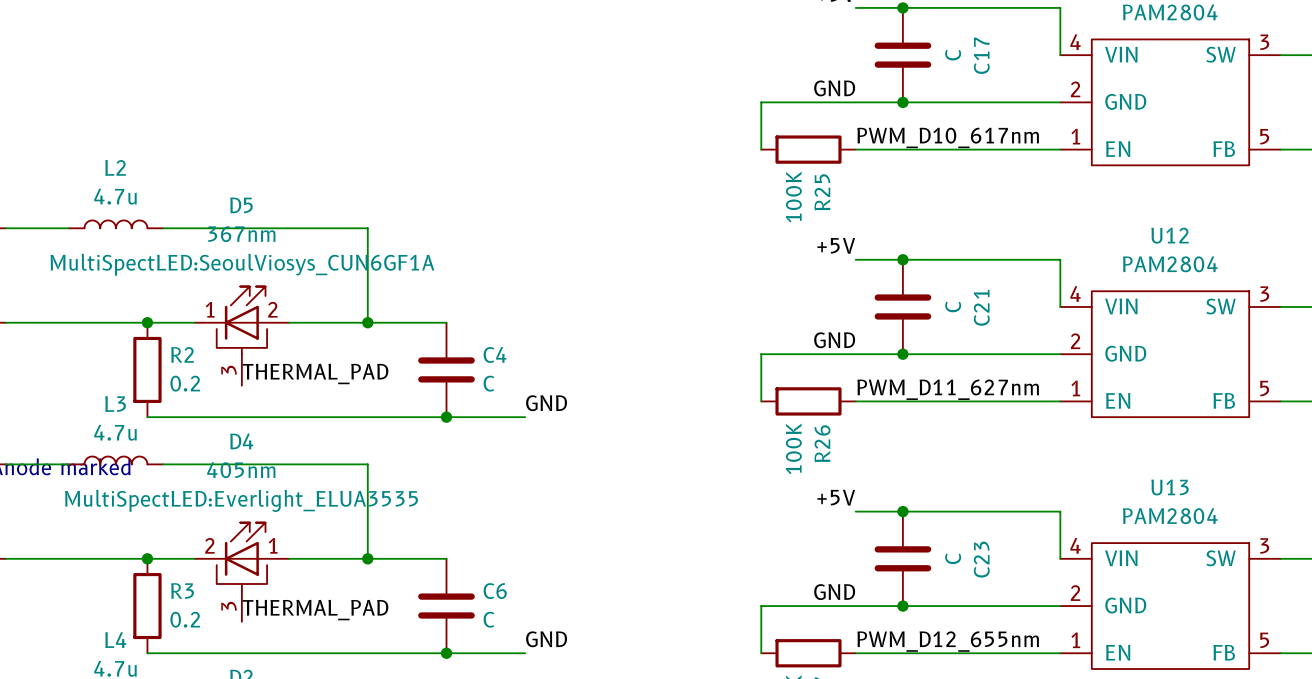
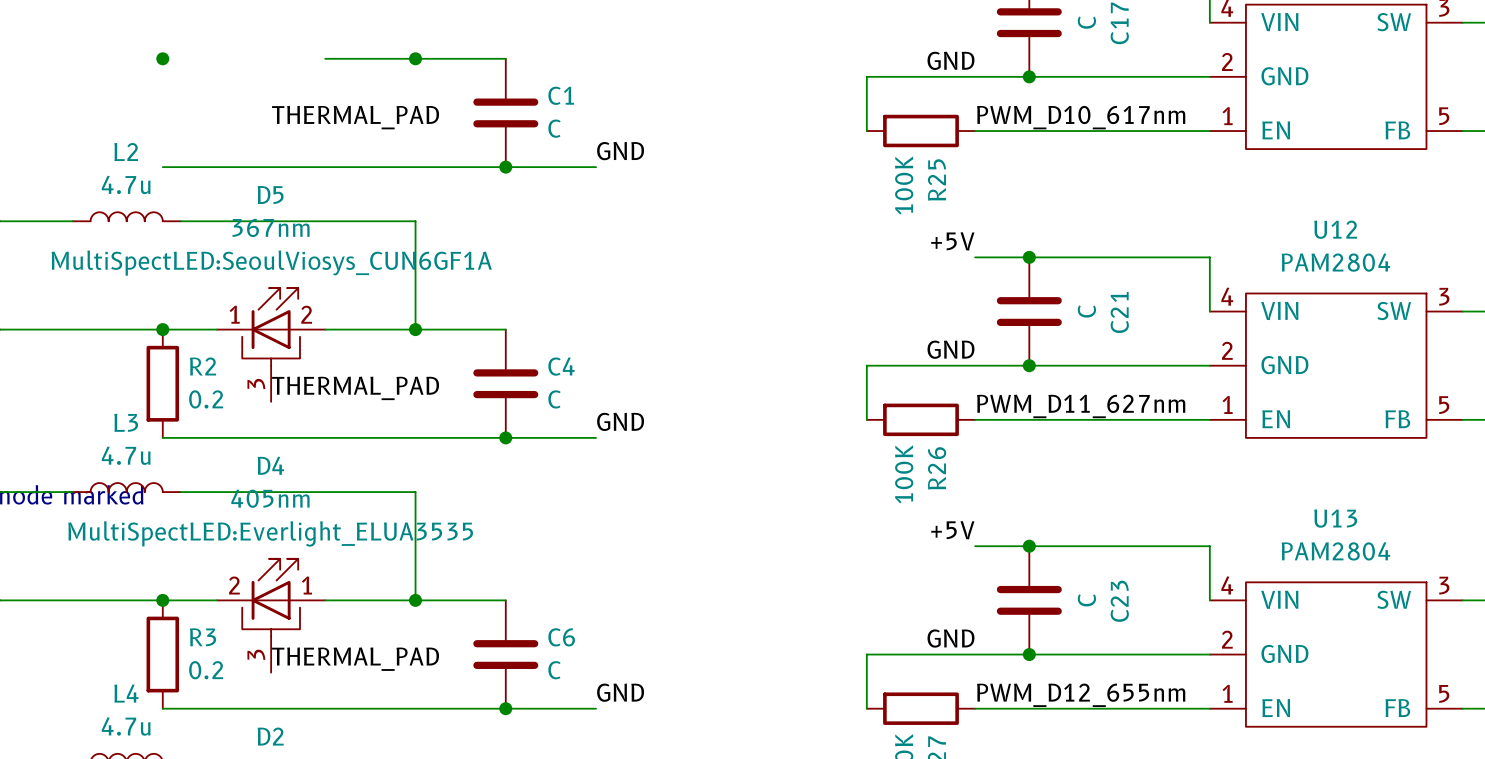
junction: none -> (162, 58)
wire: none -> (325, 58) (505, 58)
junction: none -> (415, 58)
C1: none -> C (505, 112)
label: none -> THERMAL_PAD (355, 117)
label: none -> GND (620, 151)
wire: none -> (162, 167) (596, 167)
junction: none -> (505, 167)

